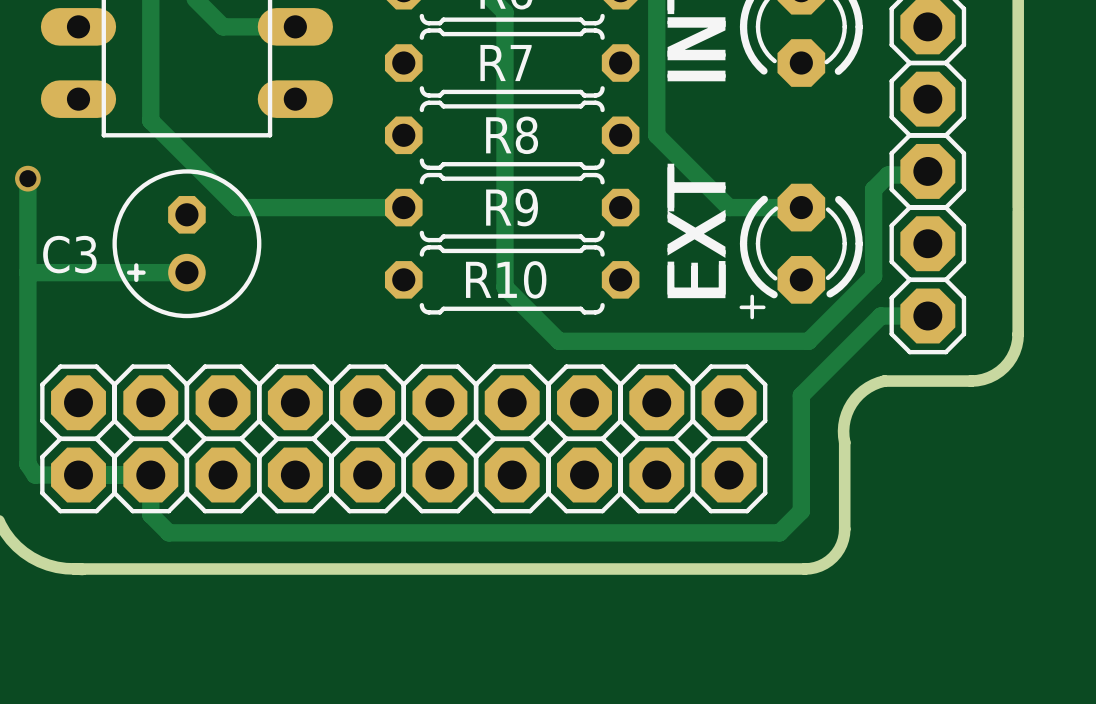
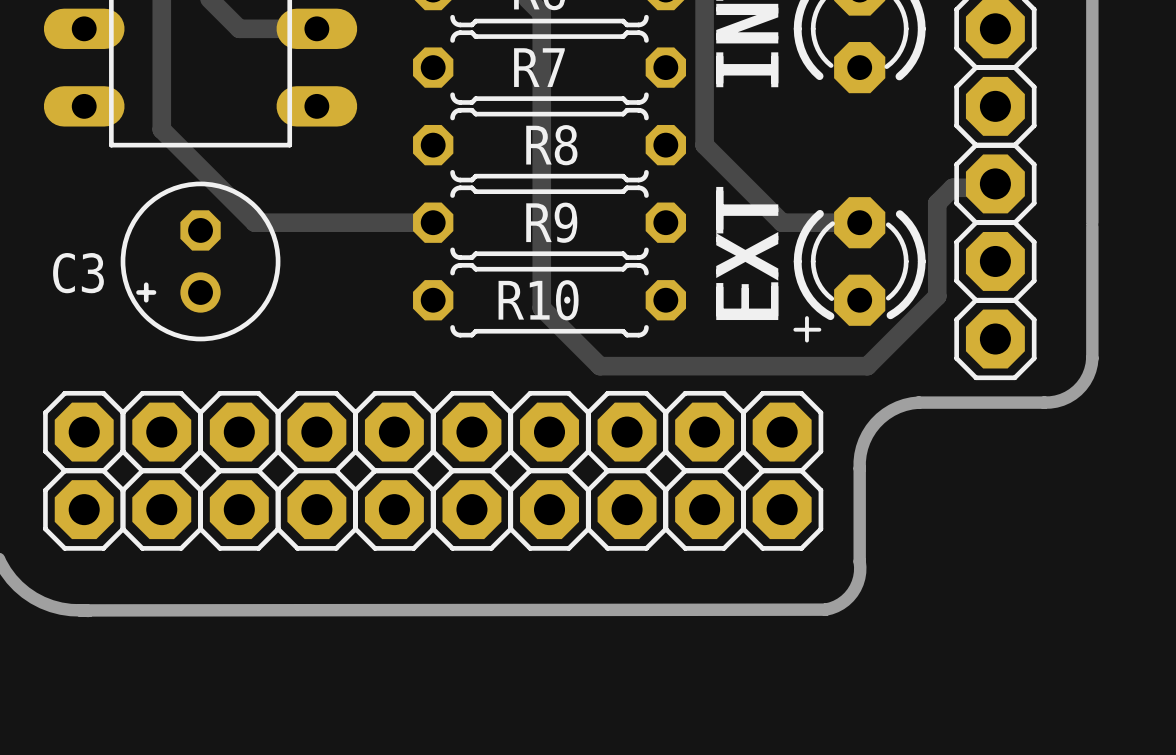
track: (27, 178) (27, 464) (35, 475) (150, 475) (150, 514) (168, 532) (779, 532) (801, 511) (801, 395) (880, 316) (927, 316) -> none
via: (27, 178) -> none
track: (27, 272) (186, 272) -> none
board edge: (1018, 334) (1014, 352) (1008, 362) (999, 371) (989, 377) (971, 381) (884, 381) (868, 387) (855, 398) (848, 408) (843, 425) (843, 539) (833, 557) (815, 567) (74, 568) -> (1092, 358) (1088, 375) (1081, 386) (1067, 397) (1056, 401) (918, 402) (898, 407) (880, 418) (867, 434) (860, 454) (859, 577) (849, 596) (830, 608) (80, 610)

